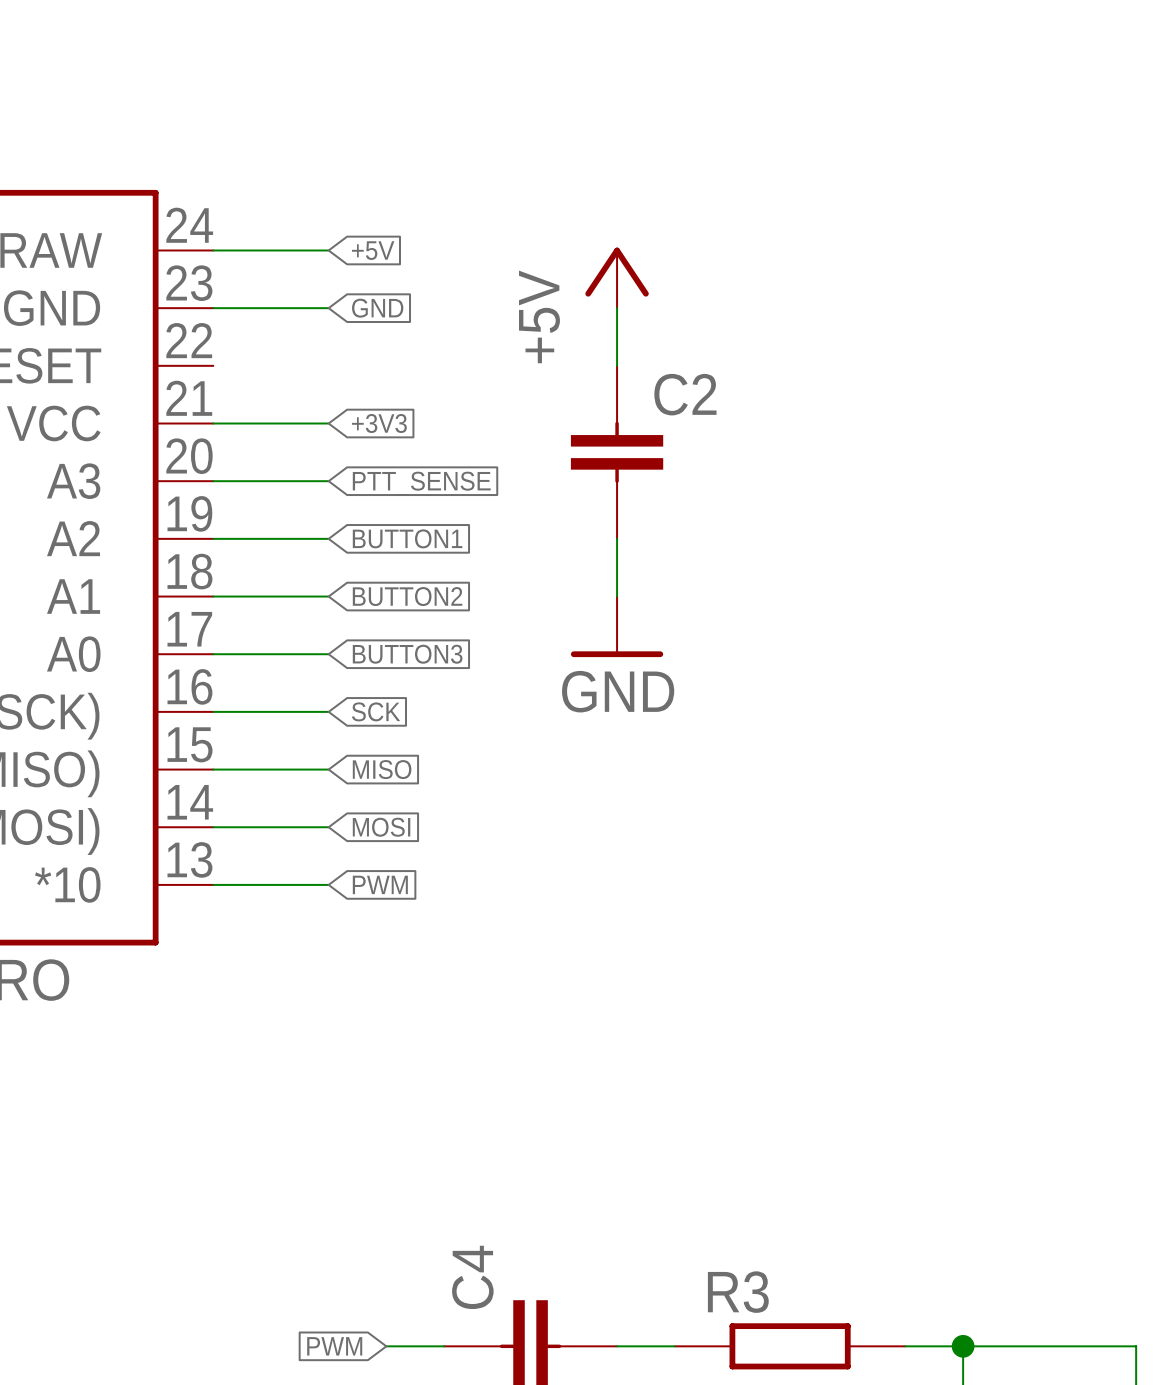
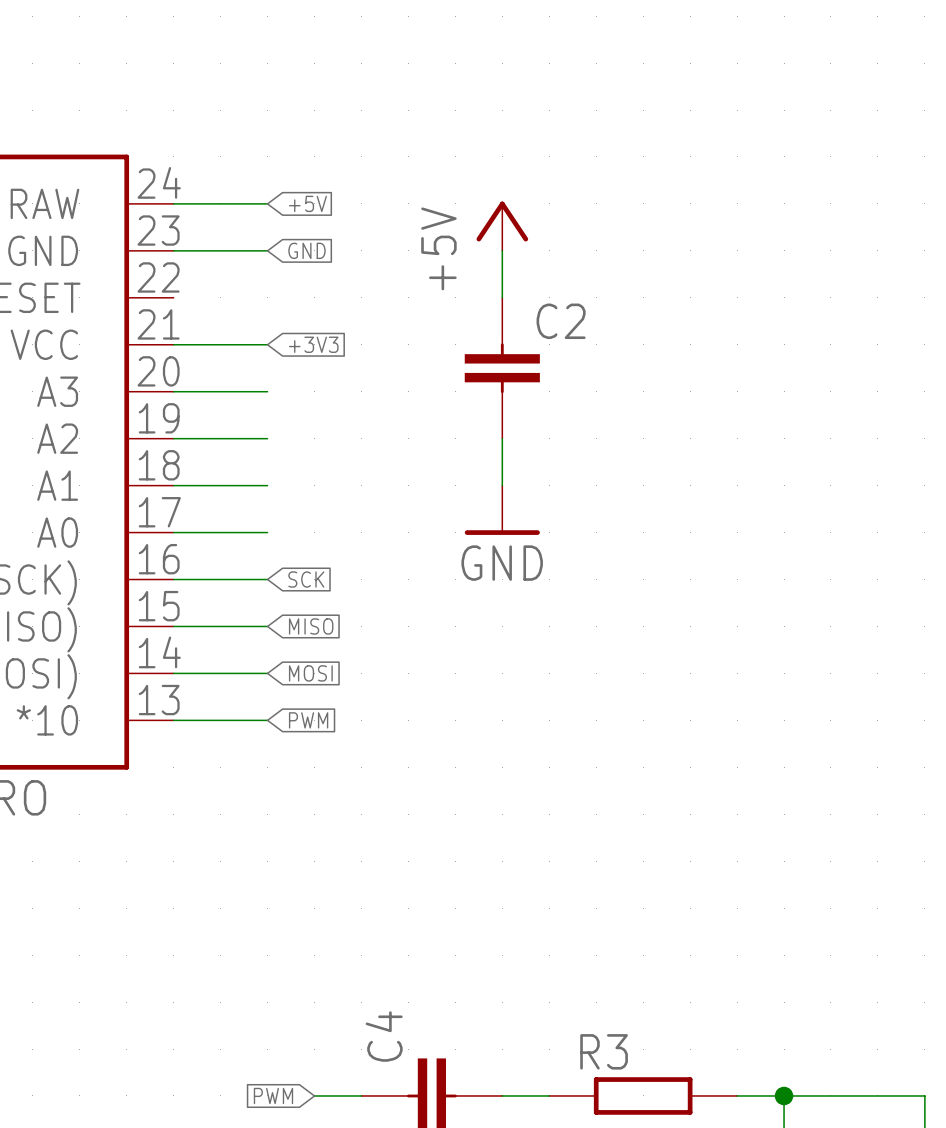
global label: PTT_SENSE (421, 483) -> none
global label: BUTTON1 (407, 538) -> none
global label: BUTTON2 (407, 596) -> none
global label: BUTTON3 (407, 654) -> none

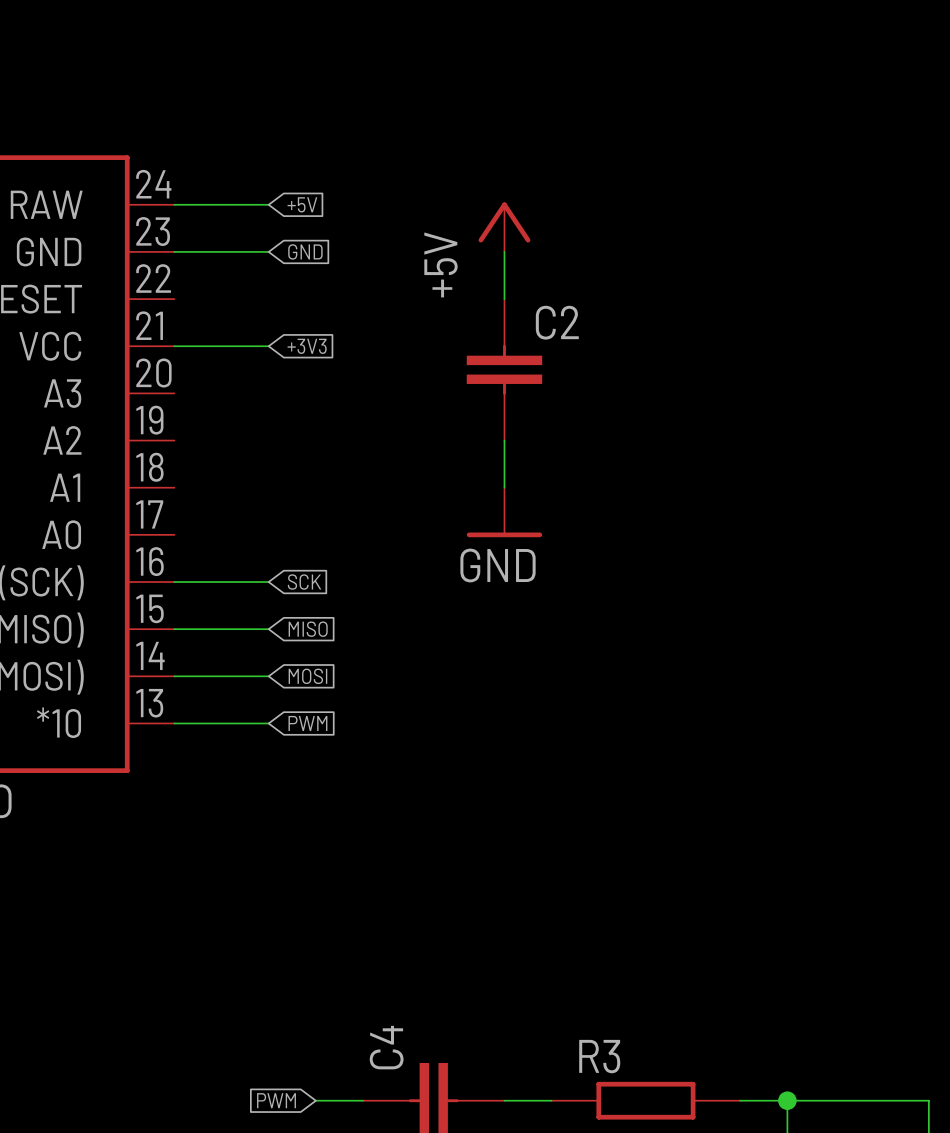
wire: (173, 391) (267, 391) -> none
wire: (173, 438) (267, 438) -> none
wire: (173, 485) (267, 485) -> none
wire: (173, 532) (267, 532) -> none

